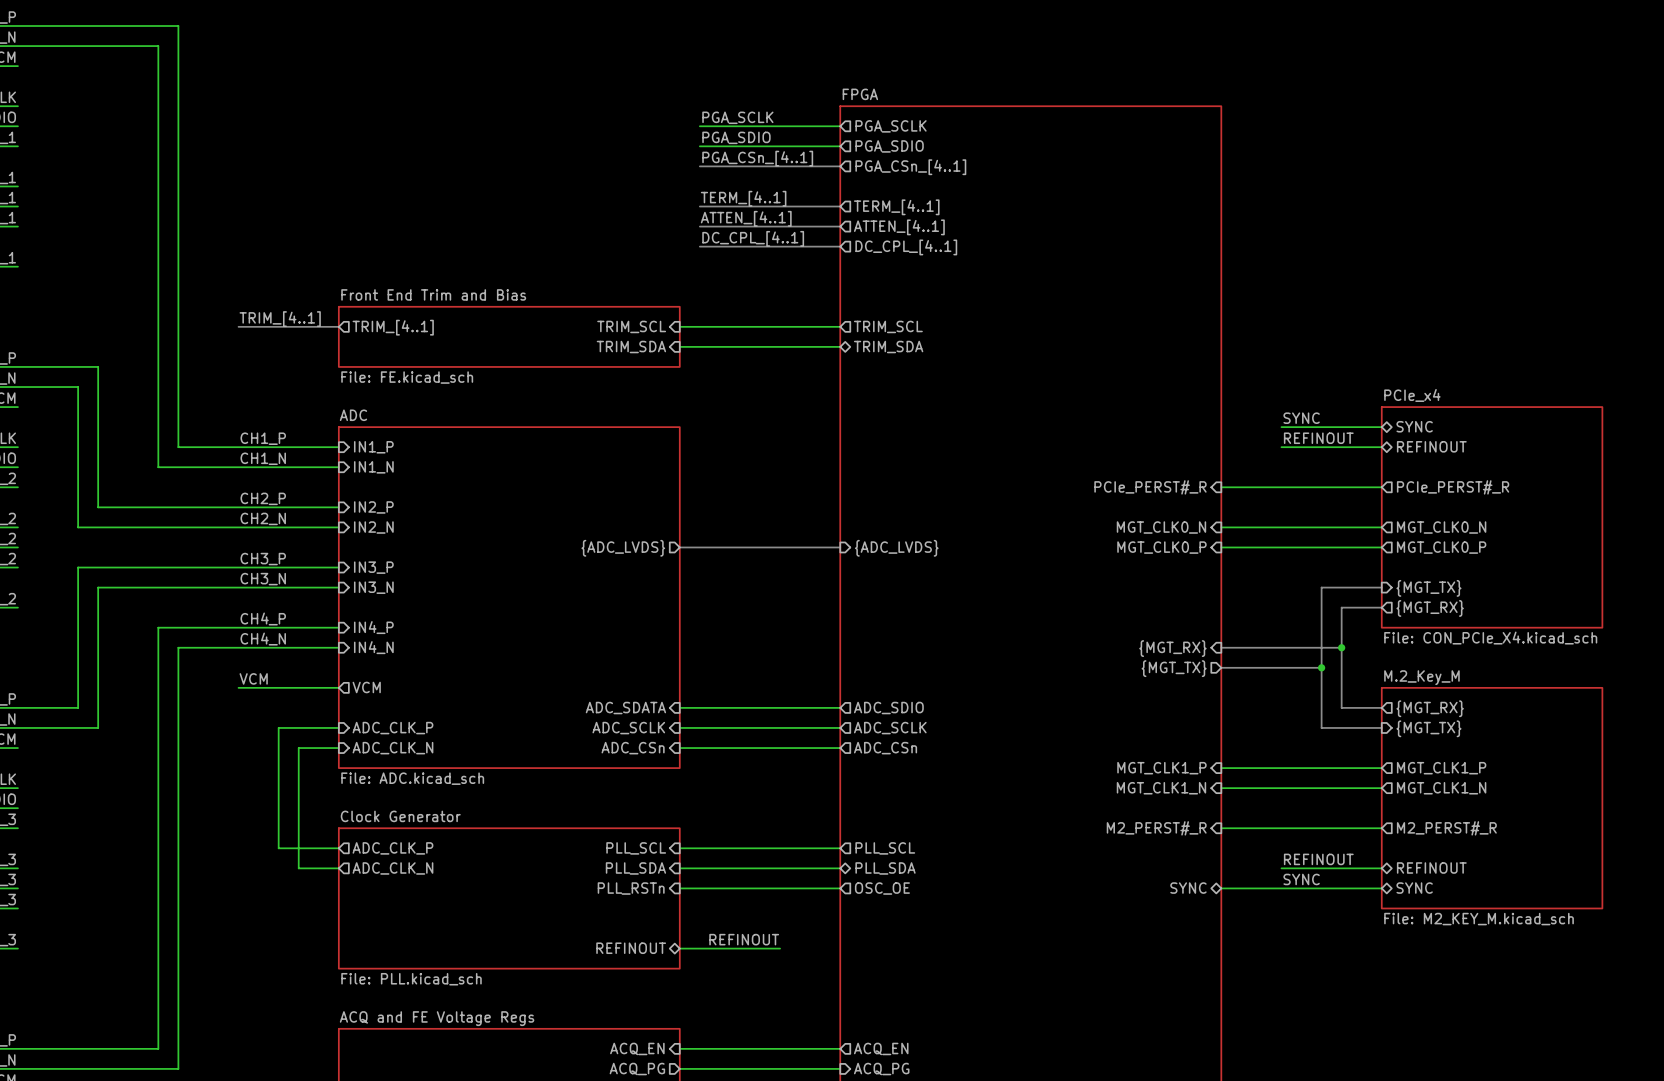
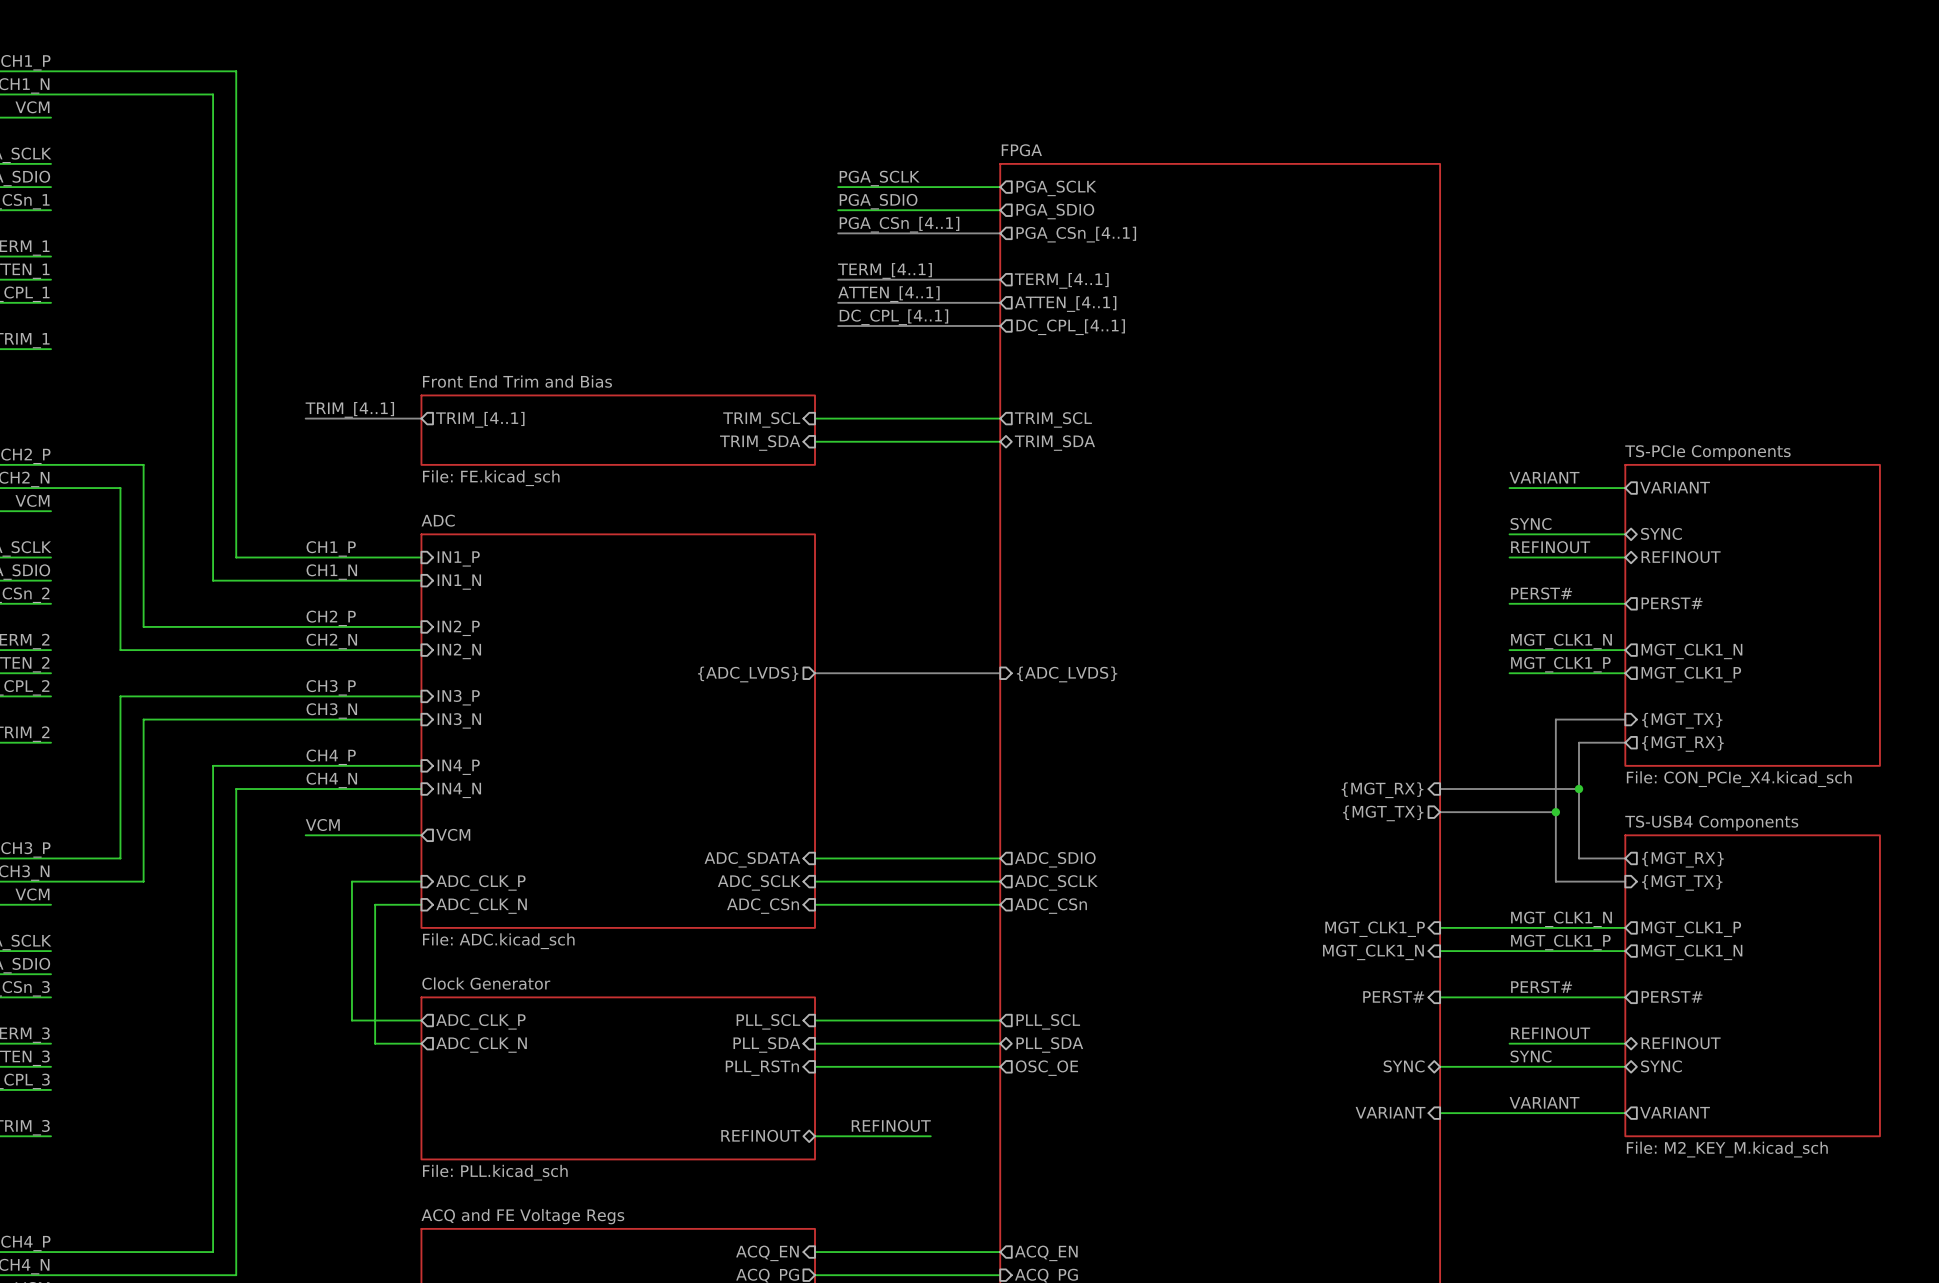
label: none -> VARIANT (1544, 477)
sheet pin: none -> VARIANT (1675, 487)
wire: none -> (1509, 488) (1625, 488)
label: none -> PERST# (1541, 593)
sheet pin: PCIe_PERST#_R (1150, 487) -> none
wire: (1221, 487) (1281, 487) -> none
sheet pin: PCIe_PERST#_R (1453, 487) -> PERST# (1672, 603)
sheet TS-PCIe Components: none -> File: CON_PCIe_X4.kicad_sch (1752, 615)
sheet PCIe_x4: File: CON_PCIe_X4.kicad_sch (1492, 517) -> none
label: none -> MGT_CLK1_N (1561, 641)
sheet pin: MGT_CLK0_N (1161, 527) -> none
wire: (1221, 527) (1281, 527) -> none
sheet pin: MGT_CLK0_N (1441, 527) -> MGT_CLK1_N (1691, 651)
label: none -> MGT_CLK1_P (1560, 664)
sheet pin: MGT_CLK0_P (1161, 547) -> none
wire: (1221, 547) (1281, 547) -> none
sheet pin: MGT_CLK0_P (1441, 547) -> MGT_CLK1_P (1691, 674)
label: none -> MGT_CLK1_N (1561, 919)
label: none -> MGT_CLK1_P (1560, 942)
sheet M.2_Key_M: File: M2_KEY_M.kicad_sch (1492, 798) -> none
sheet TS-USB4 Components: none -> File: M2_KEY_M.kicad_sch (1752, 985)
label: none -> PERST# (1541, 987)
sheet pin: M2_PERST#_R (1156, 828) -> PERST# (1393, 996)
sheet pin: M2_PERST#_R (1446, 828) -> PERST# (1672, 996)
label: none -> VARIANT (1544, 1102)
sheet pin: none -> VARIANT (1390, 1112)
wire: none -> (1440, 1113) (1625, 1113)
sheet pin: none -> VARIANT (1675, 1112)

